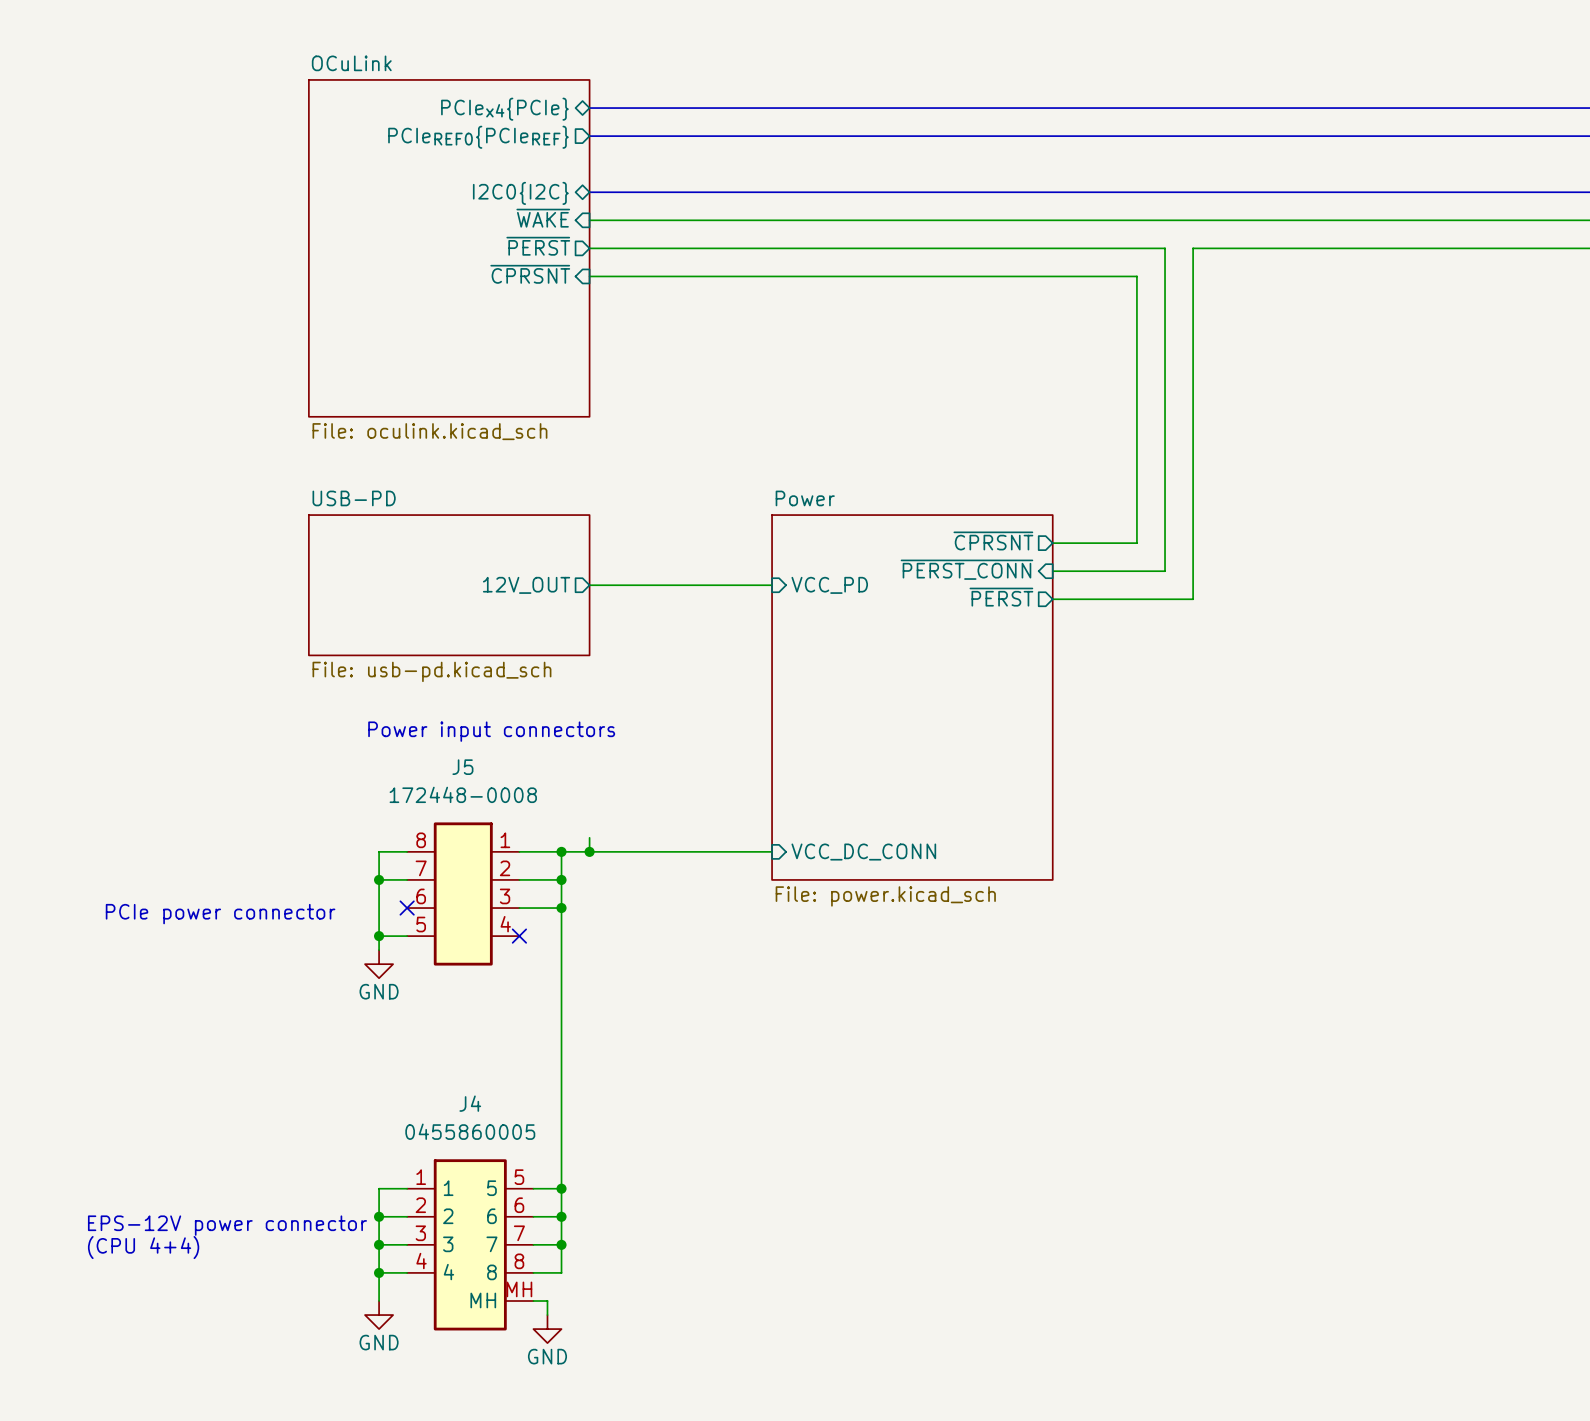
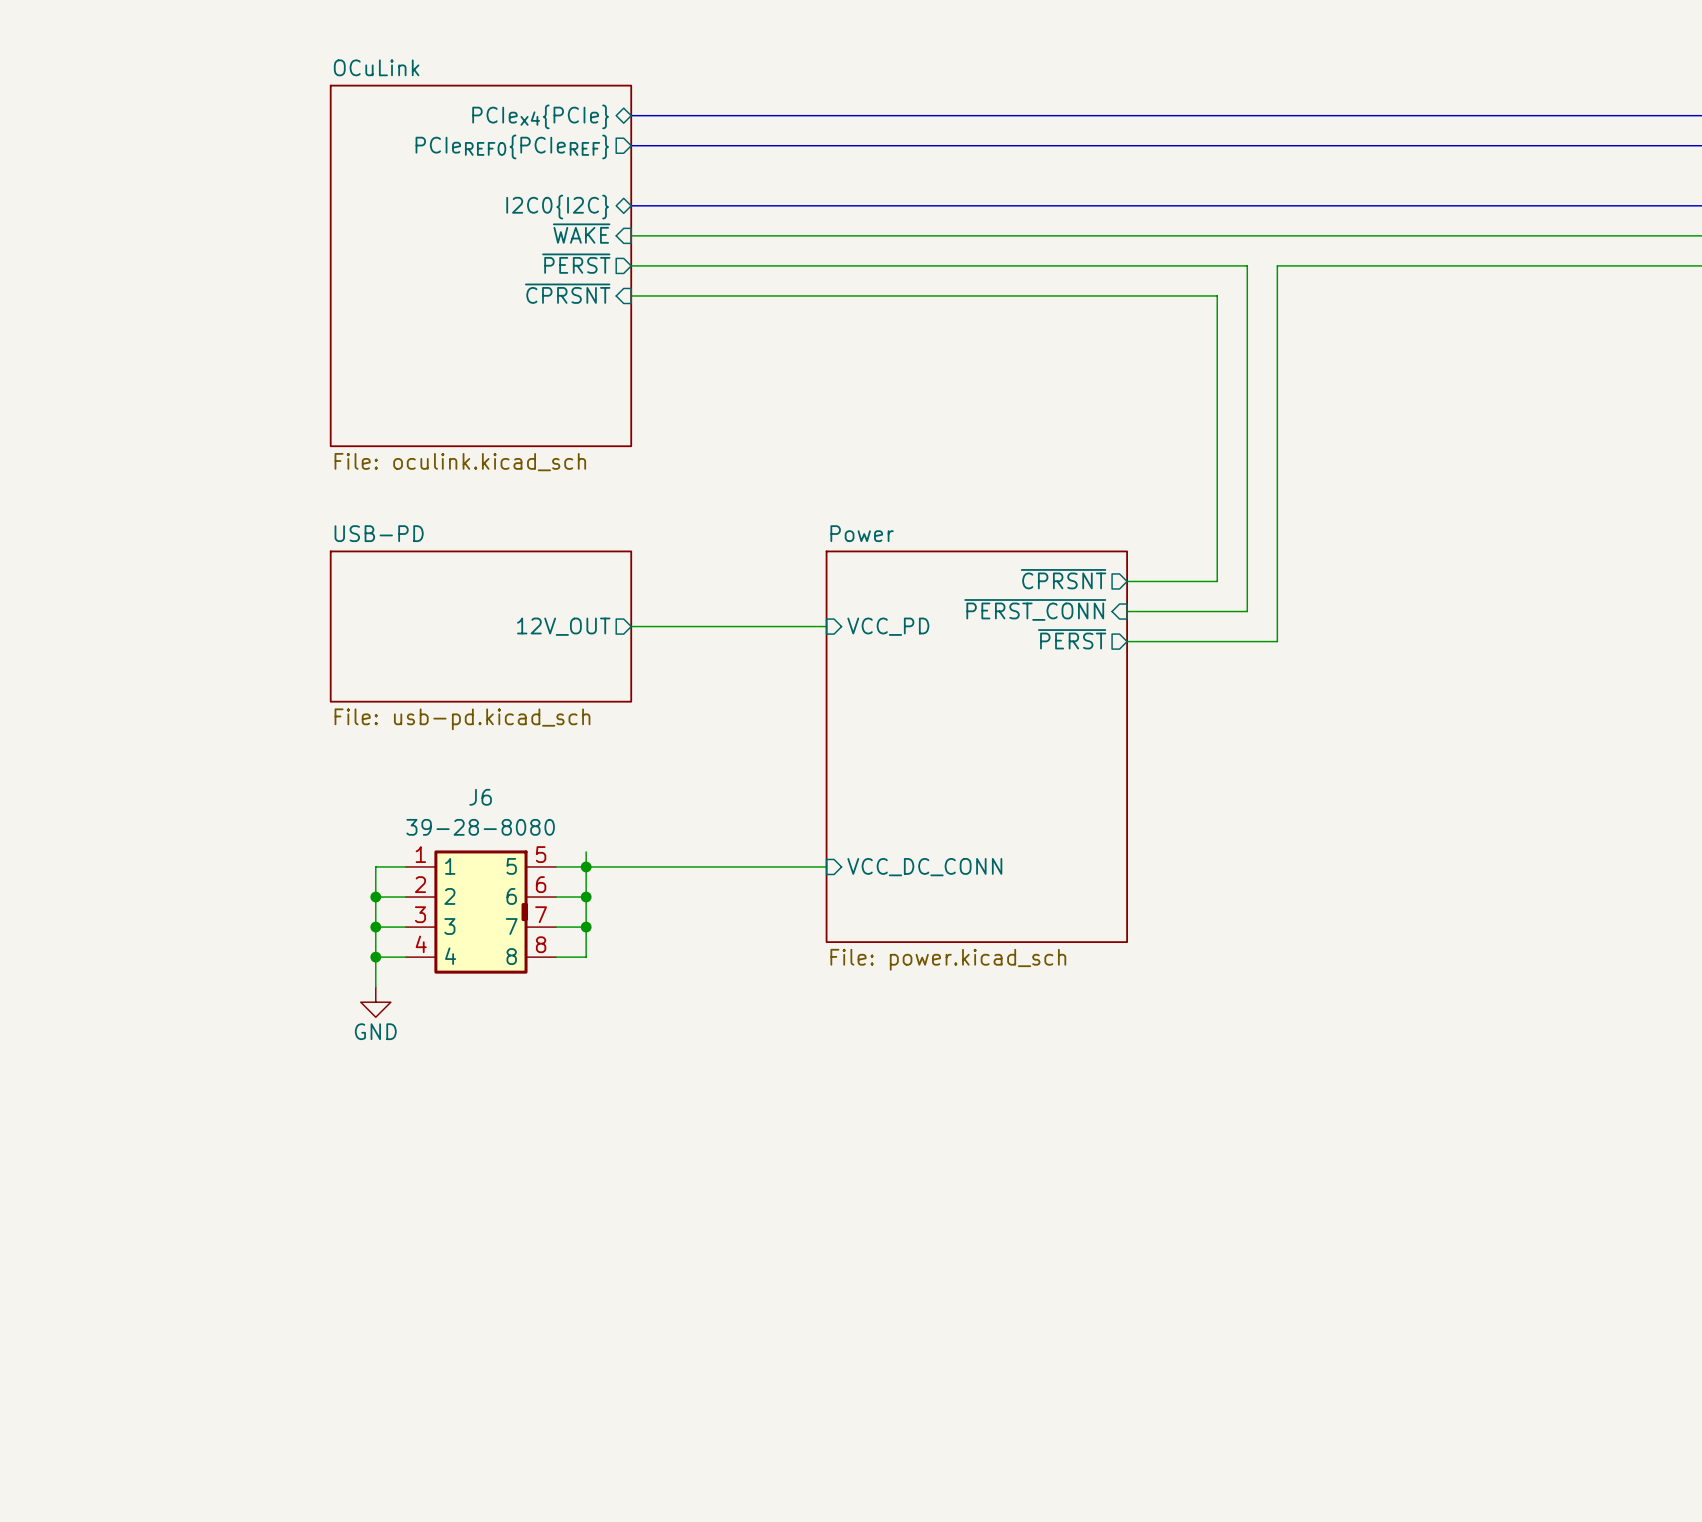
text: Power input connectors (491, 731) -> none
wire: none -> (586, 851) (586, 957) (556, 957)
wire: none -> (405, 866) (375, 866) (375, 987)
junction: none -> (586, 866)
junction: none -> (375, 897)
wire: none -> (556, 897) (586, 897)
junction: none -> (586, 897)
wire: (589, 837) (589, 851) -> none
wire: (407, 851) (379, 851) (379, 950) -> none
J6: none -> (480, 912)
wire: (519, 851) (772, 851) -> (556, 866) (826, 866)
wire: (561, 851) (561, 1272) (533, 1272) -> none
junction: (561, 851) -> none
junction: (589, 851) -> none
sheet pin position: VCC_DC_CONN (863, 852) -> VCC_DC_CONN (924, 867)
wire: none -> (375, 927) (405, 927)
junction: none -> (375, 927)
wire: none -> (556, 927) (586, 927)
junction: none -> (586, 927)
wire: (379, 879) (407, 879) -> (375, 897) (405, 897)
junction: (379, 879) -> none
wire: (519, 879) (561, 879) -> none
junction: (561, 879) -> none
junction: none -> (375, 957)
J5: (463, 893) -> none
no-connect mark: (407, 908) -> none
wire: (519, 908) (561, 908) -> none
junction: (561, 908) -> none
text: PCIe power connector (220, 914) -> none
wire: (379, 936) (407, 936) -> (375, 957) (405, 957)
junction: (379, 936) -> none
no-connect mark: (519, 936) -> none
power symbol position: GND (379, 964) -> GND (375, 1002)
wire: (407, 1188) (379, 1188) (379, 1301) -> none
wire: (533, 1188) (561, 1188) -> none
junction: (561, 1188) -> none
wire: (379, 1216) (407, 1216) -> none
junction: (379, 1216) -> none
wire: (533, 1216) (561, 1216) -> none
junction: (561, 1216) -> none
text: EPS-12V power connector (227, 1225) -> none
wire: (379, 1244) (407, 1244) -> none
junction: (379, 1244) -> none
J4: (470, 1244) -> none
wire: (533, 1244) (561, 1244) -> none
junction: (561, 1244) -> none
text: (CPU 4+4) (143, 1247) -> none
wire: (379, 1272) (407, 1272) -> none
junction: (379, 1272) -> none
wire: (533, 1301) (547, 1301) (547, 1315) -> none
power symbol: GND (379, 1315) -> none
power symbol: GND (547, 1329) -> none

